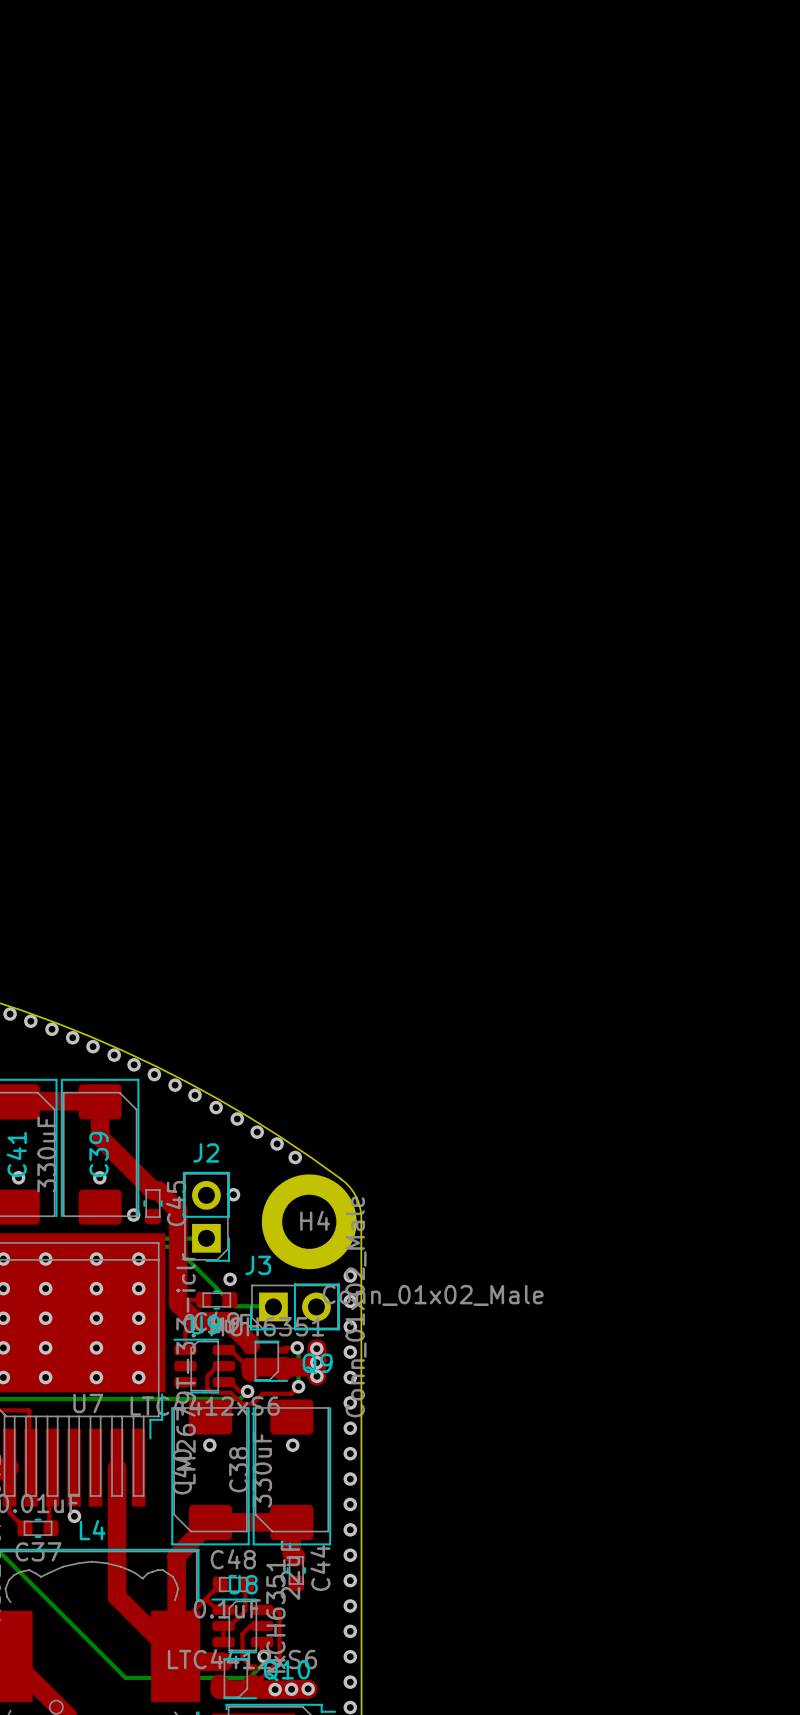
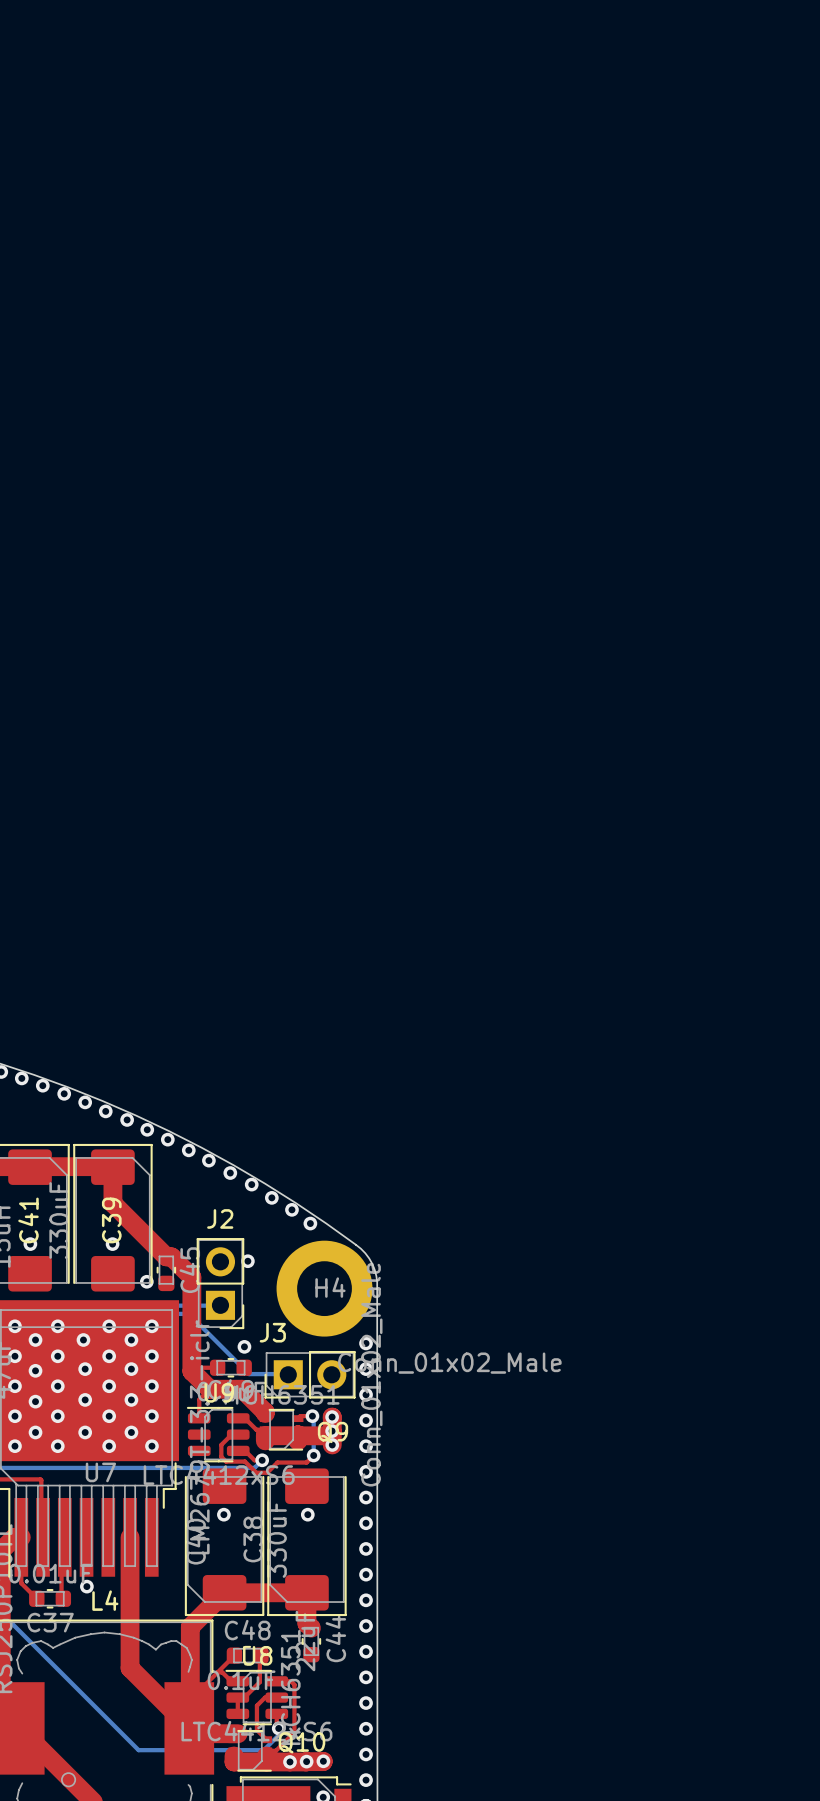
via: none -> (35, 1340)
via: none -> (83, 1340)
via: none -> (131, 1340)
via: none -> (85, 1369)
via: none -> (131, 1369)
via: none -> (35, 1370)
via: none -> (85, 1399)
via: none -> (131, 1399)
via: none -> (35, 1401)
via: none -> (35, 1432)
via: none -> (85, 1432)
via: none -> (131, 1432)

